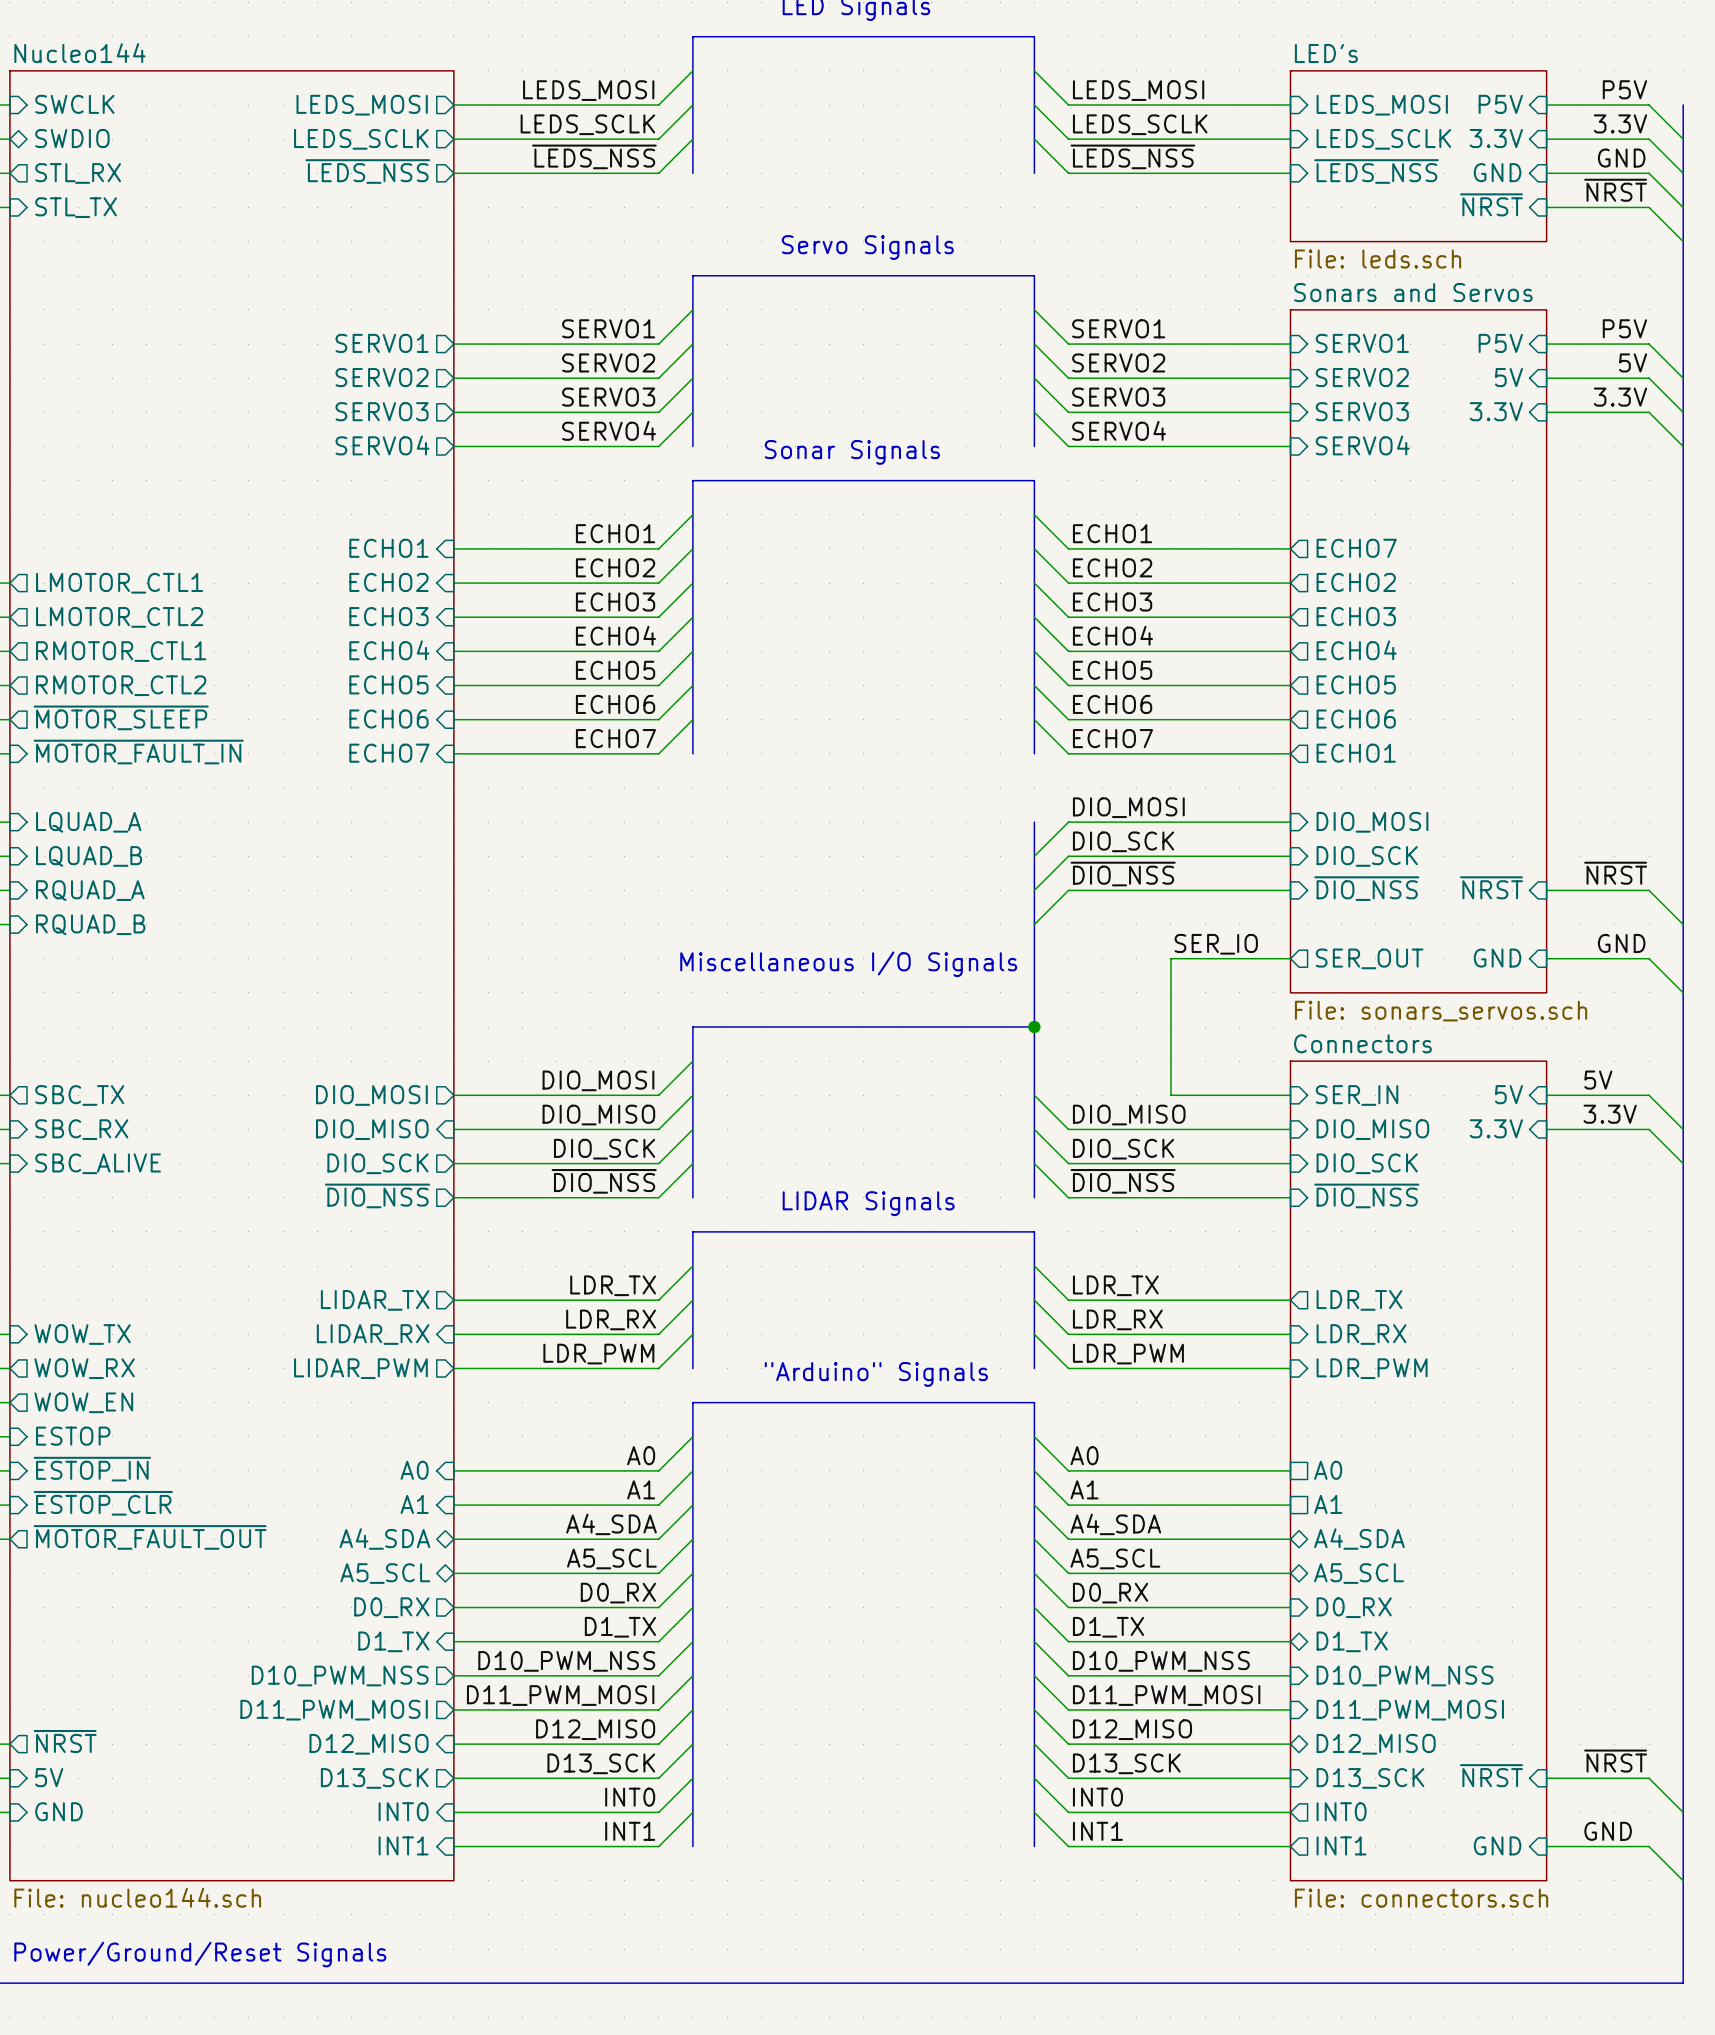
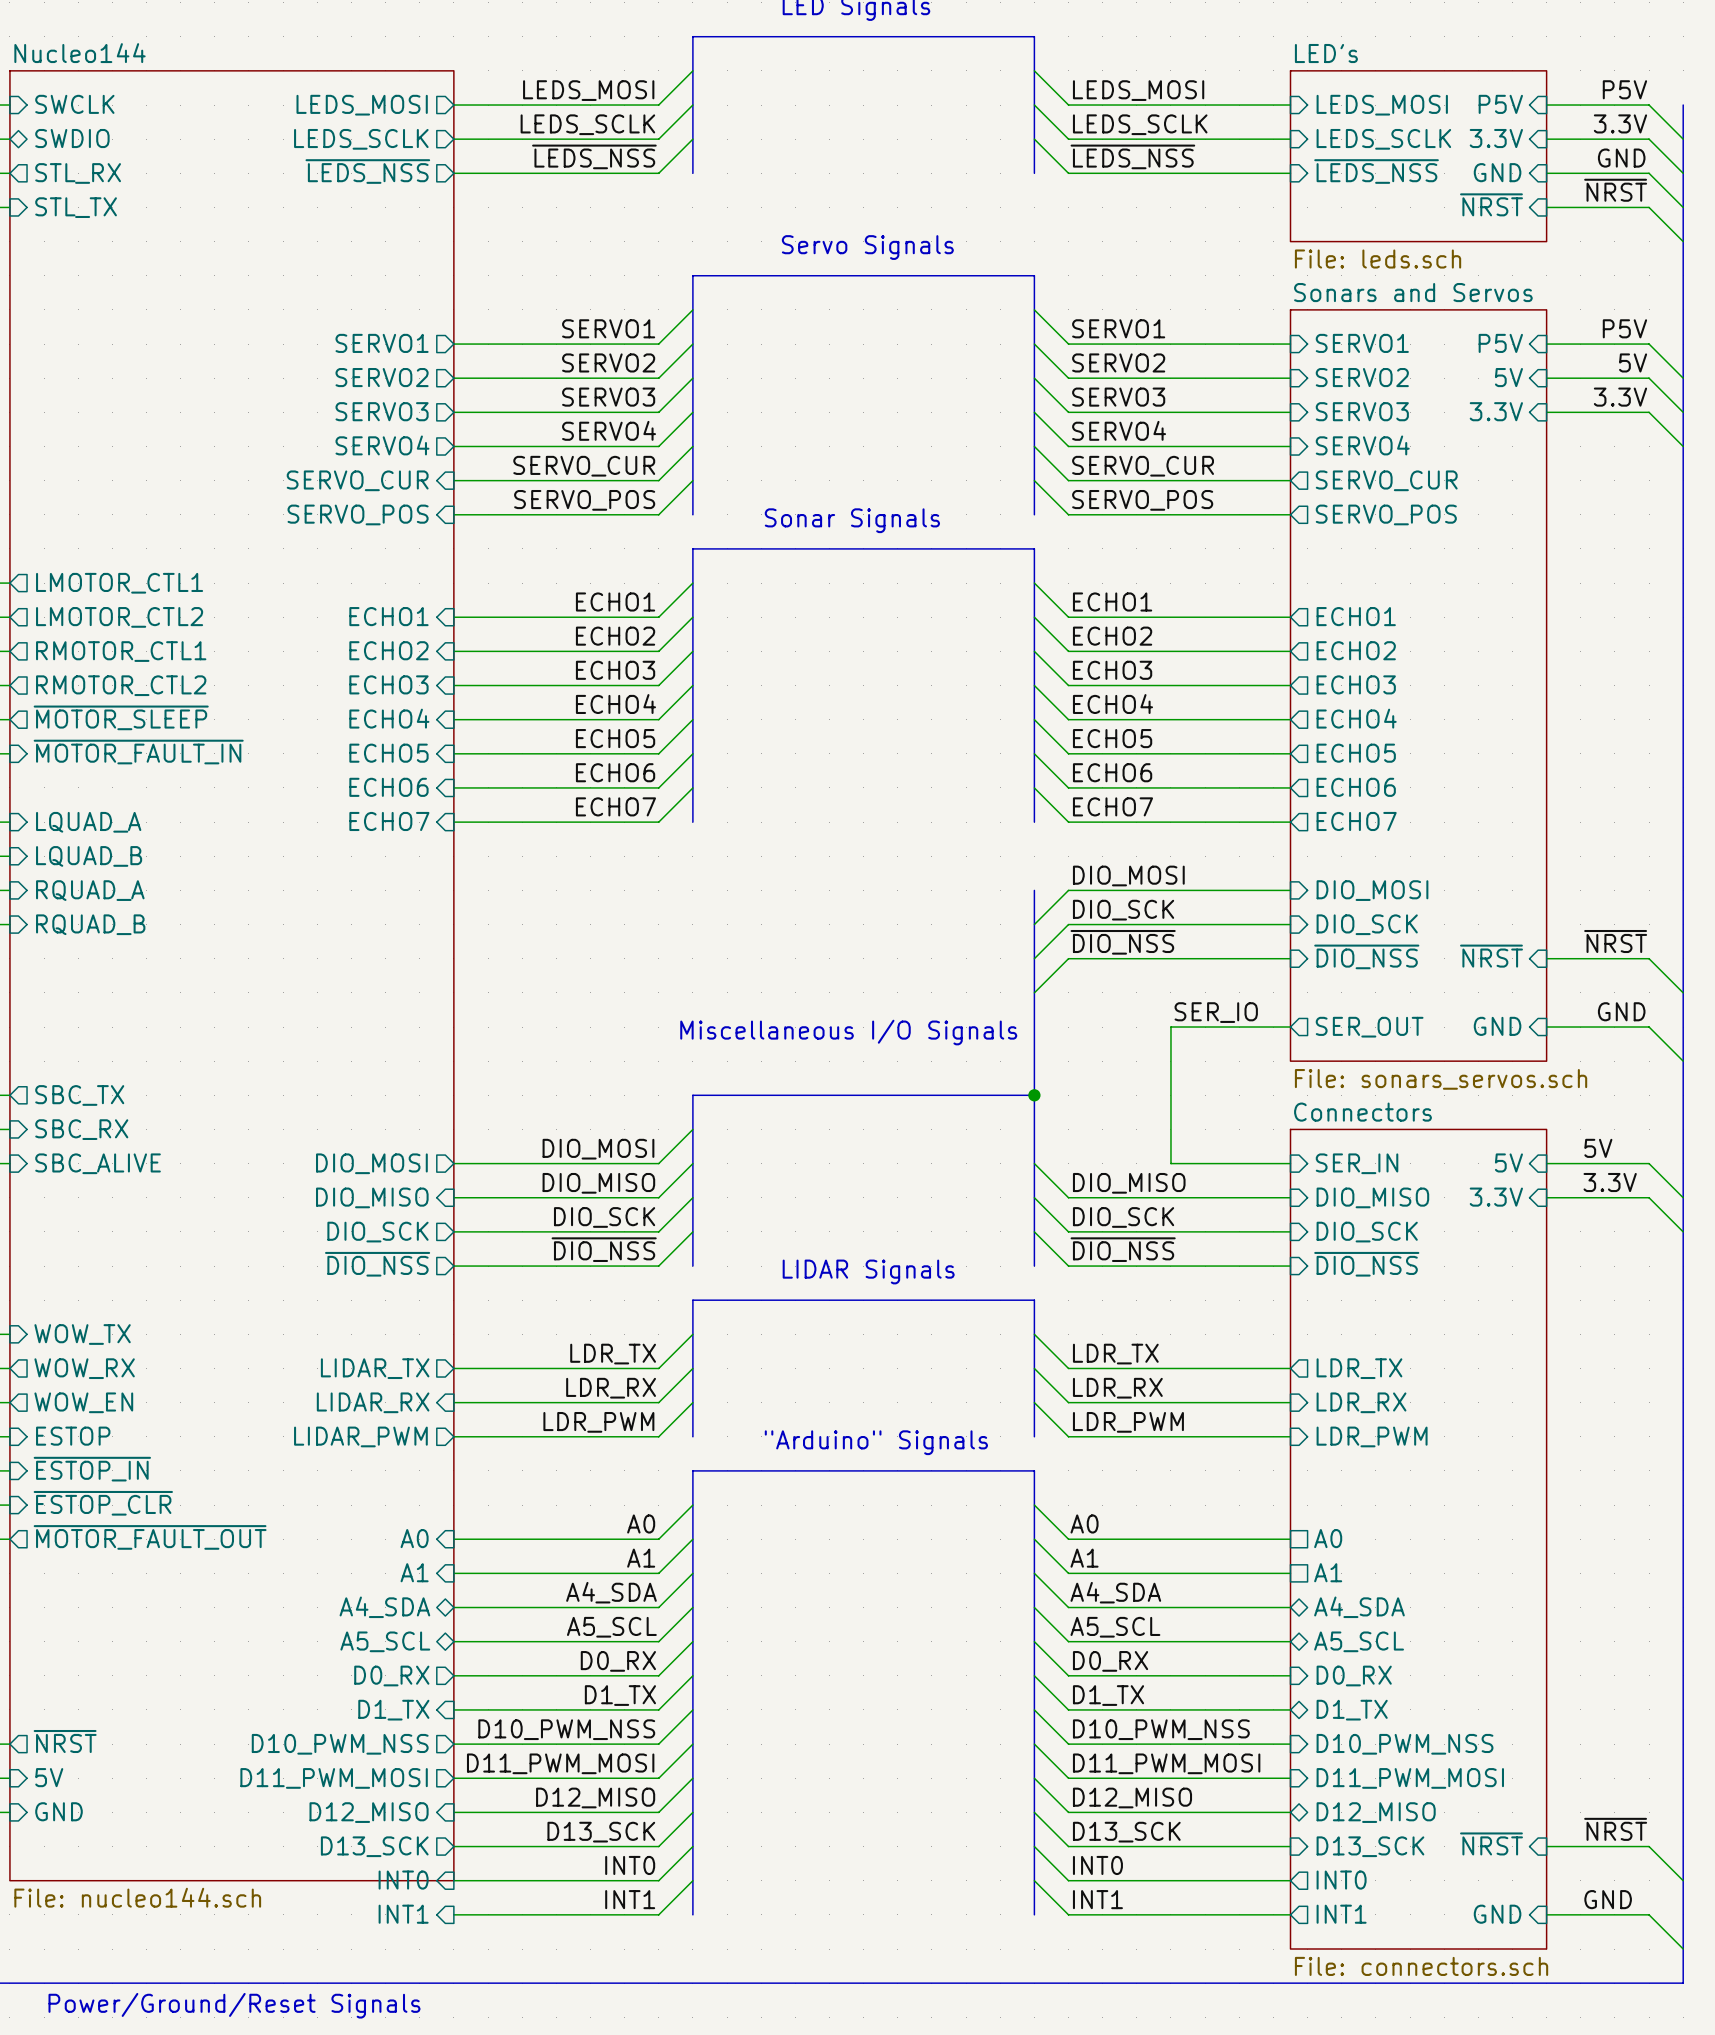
text position: Sonar Signals (852, 452) -> Sonar Signals (852, 520)
label: none -> SERVO_CUR (584, 466)
label: none -> SERVO_CUR (1143, 466)
sheet pin: none -> SERVO_CUR (357, 480)
bus: (692, 480) (1034, 480) -> (692, 480) (692, 446)
sheet pin: none -> SERVO_CUR (1386, 480)
label: none -> SERVO_POS (584, 500)
label: none -> SERVO_POS (1142, 500)
sheet pin: none -> SERVO_POS (358, 514)
wire: (692, 514) (658, 548) (453, 548) -> (692, 446) (658, 480) (453, 480)
bus: (692, 514) (692, 548) -> (1034, 548) (692, 548)
wire: (1034, 514) (1068, 548) (1290, 548) -> (1034, 446) (1068, 480) (1290, 480)
bus: (1034, 514) (1034, 548) -> (1034, 446) (1034, 480)
sheet pin: none -> SERVO_POS (1386, 514)
label: ECHO1 (615, 533) -> none
label: ECHO1 (1112, 533) -> none
sheet pin: ECHO1 (388, 548) -> none
wire: (692, 548) (658, 583) (453, 583) -> (692, 480) (658, 514) (453, 514)
wire: (1034, 548) (1068, 583) (1290, 583) -> (1034, 480) (1068, 514) (1290, 514)
sheet pin: ECHO7 (1356, 548) -> none
label: ECHO2 (615, 567) -> none
label: ECHO2 (1112, 567) -> none
sheet pin: ECHO2 (388, 582) -> none
sheet pin: ECHO2 (1356, 582) -> none
label: ECHO3 (615, 601) -> ECHO1 (615, 601)
label: ECHO3 (1112, 601) -> ECHO1 (1112, 601)
sheet pin: ECHO3 (388, 616) -> ECHO1 (388, 616)
sheet pin: ECHO3 (1356, 616) -> ECHO1 (1356, 616)
label: ECHO4 (615, 635) -> ECHO2 (615, 636)
label: ECHO4 (1112, 635) -> ECHO2 (1112, 636)
sheet pin: ECHO4 (389, 650) -> ECHO2 (388, 650)
sheet pin: ECHO4 (1356, 650) -> ECHO2 (1356, 650)
sheet Sonars and Servos: File: sonars_servos.sch (1418, 651) -> none
label: ECHO5 (615, 670) -> ECHO3 (615, 670)
label: ECHO5 (1112, 670) -> ECHO3 (1112, 670)
sheet pin: ECHO5 (388, 684) -> ECHO3 (388, 684)
sheet pin: ECHO5 (1356, 684) -> ECHO3 (1356, 684)
sheet Sonars and Servos: none -> File: sonars_servos.sch (1418, 685)
label: ECHO6 (615, 704) -> ECHO4 (615, 704)
label: ECHO6 (1112, 704) -> ECHO4 (1112, 704)
sheet pin: ECHO6 (388, 719) -> ECHO4 (389, 718)
sheet pin: ECHO6 (1356, 719) -> ECHO4 (1356, 718)
label: ECHO7 (615, 738) -> ECHO5 (615, 738)
label: ECHO7 (1112, 738) -> ECHO5 (1112, 738)
sheet pin: ECHO7 (389, 753) -> ECHO5 (388, 753)
wire: none -> (692, 753) (658, 787) (453, 787)
bus: none -> (692, 753) (692, 822)
wire: none -> (1034, 753) (1068, 787) (1290, 787)
sheet pin: ECHO1 (1356, 753) -> ECHO5 (1356, 753)
label: none -> ECHO6 (615, 772)
label: none -> ECHO6 (1112, 772)
sheet pin: none -> ECHO6 (388, 787)
sheet pin: none -> ECHO6 (1356, 787)
label: none -> ECHO7 (615, 806)
label: DIO_MOSI (1128, 807) -> ECHO7 (1112, 806)
sheet pin: none -> ECHO7 (389, 821)
bus: (1034, 822) (1034, 890) -> (1034, 822) (1034, 753)
wire: (1068, 822) (1034, 856) -> (1068, 822) (1034, 787)
sheet pin shape: input (1372, 822) -> output (1356, 821)
sheet pin: DIO_MOSI (1372, 822) -> ECHO7 (1356, 821)
label position: DIO_SCK (1123, 841) -> DIO_SCK (1123, 910)
wire: (1290, 856) (1068, 856) (1034, 890) -> (1290, 924) (1068, 924) (1034, 958)
sheet pin position: DIO_SCK (1367, 856) -> DIO_SCK (1367, 924)
label: ~{NRST} (1615, 873) -> none
label: ~{DIO_NSS} (1123, 874) -> DIO_MOSI (1128, 875)
sheet pin: ~{NRST} (1491, 887) -> none
sheet pin: ~{DIO_NSS} (1366, 888) -> DIO_MOSI (1372, 890)
wire: (1546, 890) (1649, 890) (1683, 924) -> (1546, 1163) (1649, 1163) (1683, 1197)
label: none -> ~{DIO_NSS} (1123, 942)
label: GND (1621, 943) -> ~{NRST} (1615, 941)
label position: SER_IO (1216, 944) -> SER_IO (1216, 1012)
wire: (1170, 958) (1170, 1027) -> (1290, 1027) (1170, 1027)
wire: none -> (1170, 958) (1068, 958) (1034, 992)
sheet pin shape: output (1369, 958) -> input (1366, 956)
sheet pin: SER_OUT (1369, 958) -> ~{DIO_NSS} (1366, 956)
sheet pin: GND (1497, 958) -> ~{NRST} (1491, 956)
text position: Miscellaneous I/O Signals (848, 964) -> Miscellaneous I/O Signals (848, 1032)
label: none -> GND (1621, 1011)
sheet pin: none -> GND (1497, 1026)
bus: (1034, 1027) (692, 1027) (692, 1095) -> (1034, 1095) (692, 1095)
junction position: (1034, 1027) -> (1034, 1095)
sheet pin: none -> SER_OUT (1369, 1027)
wire: (692, 1061) (658, 1095) (453, 1095) -> (692, 787) (658, 822) (453, 822)
label: DIO_MOSI (598, 1080) -> none
label position: 5V (1598, 1080) -> 5V (1598, 1148)
sheet pin position: 5V (1508, 1094) -> 5V (1508, 1162)
sheet pin: DIO_MOSI (371, 1095) -> none
wire: (692, 1095) (658, 1129) (453, 1129) -> none
wire: (1034, 1095) (1068, 1129) (1290, 1129) -> none
wire: (1170, 1095) (1290, 1095) -> (1170, 1095) (1170, 1163)
sheet pin: SER_IN (1357, 1095) -> none
wire: (1546, 1095) (1649, 1095) (1683, 1129) -> (1546, 1027) (1649, 1027) (1683, 1061)
label position: 3.3V (1610, 1114) -> 3.3V (1610, 1182)
label: DIO_MISO (598, 1115) -> none
label: DIO_MISO (1129, 1115) -> none
sheet pin position: 3.3V (1496, 1128) -> 3.3V (1496, 1197)
sheet pin: DIO_MISO (372, 1129) -> none
wire: (1034, 1129) (1068, 1163) (1170, 1163) -> none
sheet pin: DIO_MISO (1372, 1129) -> none
wire: (1546, 1129) (1649, 1129) (1683, 1163) -> (1546, 1197) (1649, 1197) (1683, 1231)
label: DIO_SCK (604, 1149) -> DIO_MOSI (598, 1149)
label position: DIO_SCK (1123, 1149) -> DIO_SCK (1123, 1217)
sheet pin: DIO_SCK (377, 1163) -> DIO_MOSI (371, 1163)
sheet pin: DIO_SCK (1367, 1163) -> SER_IN (1357, 1163)
label: ~{DIO_NSS} (604, 1181) -> DIO_MISO (598, 1183)
label: ~{DIO_NSS} (1123, 1181) -> DIO_MISO (1129, 1183)
sheet pin shape: output (377, 1195) -> input (372, 1197)
sheet pin: ~{DIO_NSS} (377, 1195) -> DIO_MISO (372, 1197)
sheet pin: ~{DIO_NSS} (1366, 1195) -> DIO_MISO (1372, 1197)
text position: LIDAR Signals (868, 1203) -> LIDAR Signals (868, 1271)
label: none -> DIO_SCK (604, 1217)
bus: (692, 1231) (1034, 1231) -> (692, 1231) (692, 1197)
sheet pin: none -> DIO_SCK (377, 1232)
sheet pin: none -> DIO_SCK (1367, 1232)
label: none -> ~{DIO_NSS} (604, 1249)
label: none -> ~{DIO_NSS} (1123, 1249)
sheet pin: none -> ~{DIO_NSS} (377, 1264)
sheet pin: none -> ~{DIO_NSS} (1366, 1264)
wire: (692, 1266) (658, 1300) (453, 1300) -> (692, 1197) (658, 1231) (453, 1231)
bus: (692, 1266) (692, 1300) -> (1034, 1300) (692, 1300)
wire: (1034, 1266) (1068, 1300) (1290, 1300) -> (1034, 1197) (1068, 1231) (1290, 1231)
bus: (1034, 1266) (1034, 1300) -> (1034, 1197) (1034, 1231)
label: LDR_TX (613, 1285) -> none
label: LDR_TX (1115, 1285) -> none
sheet pin: LIDAR_TX (375, 1300) -> none
wire: (692, 1300) (658, 1334) (453, 1334) -> (692, 1231) (658, 1266) (453, 1266)
wire: (1034, 1300) (1068, 1334) (1290, 1334) -> (1034, 1231) (1068, 1266) (1290, 1266)
sheet pin: LDR_TX (1359, 1300) -> none
label position: LDR_RX (611, 1319) -> LDR_RX (611, 1388)
label position: LDR_RX (1117, 1319) -> LDR_RX (1117, 1388)
sheet pin position: LIDAR_RX (373, 1334) -> LIDAR_RX (373, 1402)
sheet pin position: LDR_RX (1361, 1334) -> LDR_RX (1361, 1402)
label: LDR_PWM (598, 1354) -> LDR_TX (613, 1354)
label: LDR_PWM (1128, 1354) -> LDR_TX (1115, 1354)
sheet pin: LIDAR_PWM (360, 1368) -> LIDAR_TX (375, 1368)
sheet pin shape: input (1372, 1368) -> output (1359, 1368)
sheet pin: LDR_PWM (1372, 1368) -> LDR_TX (1359, 1368)
text position: "Arduino" Signals (876, 1374) -> "Arduino" Signals (876, 1442)
bus: (692, 1402) (1034, 1402) -> (692, 1402) (692, 1368)
label: none -> LDR_PWM (598, 1422)
label: none -> LDR_PWM (1128, 1422)
sheet pin: none -> LIDAR_PWM (360, 1436)
wire: (692, 1436) (658, 1470) (453, 1470) -> (692, 1368) (658, 1402) (453, 1402)
bus: (692, 1436) (692, 1470) -> (1034, 1470) (692, 1470)
wire: (1034, 1436) (1068, 1470) (1290, 1470) -> (1034, 1368) (1068, 1402) (1290, 1402)
bus: (1034, 1436) (1034, 1470) -> (1034, 1368) (1034, 1402)
sheet pin: none -> LDR_PWM (1372, 1436)
label: A0 (641, 1455) -> none
label: A0 (1084, 1455) -> none
sheet pin: A0 (414, 1470) -> none
wire: (692, 1470) (658, 1505) (453, 1505) -> (692, 1402) (658, 1436) (453, 1436)
wire: (1034, 1470) (1068, 1505) (1290, 1505) -> (1034, 1402) (1068, 1436) (1290, 1436)
sheet pin: A0 (1328, 1470) -> none
sheet Connectors position: (1418, 1470) -> (1418, 1539)
label: A1 (641, 1489) -> none
label: A1 (1084, 1489) -> none
sheet pin: A1 (414, 1504) -> none
sheet pin: A1 (1328, 1504) -> none
label: A4_SDA (611, 1524) -> A0 (641, 1523)
label: A4_SDA (1115, 1524) -> A0 (1084, 1523)
sheet pin shape: bidirectional (384, 1538) -> input (414, 1538)
sheet pin: A4_SDA (384, 1538) -> A0 (414, 1538)
sheet pin shape: bidirectional (1359, 1538) -> passive (1328, 1538)
sheet pin: A4_SDA (1359, 1538) -> A0 (1328, 1538)
label: A5_SCL (611, 1558) -> A1 (641, 1558)
label: A5_SCL (1115, 1558) -> A1 (1084, 1558)
sheet pin shape: bidirectional (385, 1573) -> input (414, 1572)
sheet pin: A5_SCL (385, 1573) -> A1 (414, 1572)
sheet pin shape: bidirectional (1359, 1573) -> passive (1328, 1572)
sheet pin: A5_SCL (1359, 1573) -> A1 (1328, 1572)
label: D0_RX (618, 1593) -> A4_SDA (611, 1592)
label: D0_RX (1110, 1593) -> A4_SDA (1115, 1592)
sheet pin shape: output (391, 1607) -> bidirectional (384, 1607)
sheet pin: D0_RX (391, 1607) -> A4_SDA (384, 1607)
sheet pin shape: input (1354, 1607) -> bidirectional (1359, 1607)
sheet pin: D0_RX (1354, 1607) -> A4_SDA (1359, 1607)
label: D1_TX (620, 1627) -> A5_SCL (611, 1627)
label: D1_TX (1108, 1627) -> A5_SCL (1115, 1627)
sheet pin shape: input (393, 1641) -> bidirectional (385, 1641)
sheet pin: D1_TX (393, 1641) -> A5_SCL (385, 1641)
sheet pin: D1_TX (1352, 1641) -> A5_SCL (1359, 1641)
label: D10_PWM_NSS (566, 1661) -> D0_RX (618, 1661)
label: D10_PWM_NSS (1161, 1661) -> D0_RX (1110, 1661)
sheet pin: D10_PWM_NSS (340, 1675) -> D0_RX (391, 1675)
sheet pin: D10_PWM_NSS (1405, 1675) -> D0_RX (1354, 1675)
label: D11_PWM_MOSI (560, 1695) -> D1_TX (620, 1695)
label: D11_PWM_MOSI (1166, 1695) -> D1_TX (1108, 1695)
sheet pin shape: output (334, 1710) -> input (393, 1710)
sheet pin: D11_PWM_MOSI (334, 1710) -> D1_TX (393, 1710)
sheet pin shape: input (1410, 1710) -> bidirectional (1352, 1710)
sheet pin: D11_PWM_MOSI (1410, 1710) -> D1_TX (1352, 1710)
label: D12_MISO (595, 1729) -> D10_PWM_NSS (566, 1729)
label: D12_MISO (1132, 1729) -> D10_PWM_NSS (1161, 1729)
sheet pin shape: input (369, 1744) -> output (340, 1744)
sheet pin: D12_MISO (369, 1744) -> D10_PWM_NSS (340, 1744)
sheet pin shape: bidirectional (1376, 1744) -> input (1405, 1744)
sheet pin: D12_MISO (1376, 1744) -> D10_PWM_NSS (1405, 1744)
label position: ~{NRST} (1615, 1761) -> ~{NRST} (1615, 1829)
label: D13_SCK (601, 1763) -> D11_PWM_MOSI (560, 1763)
label: D13_SCK (1126, 1763) -> D11_PWM_MOSI (1166, 1763)
sheet pin: ~{NRST} (1491, 1775) -> none
sheet pin: D13_SCK (374, 1778) -> D11_PWM_MOSI (334, 1778)
sheet pin: D13_SCK (1370, 1778) -> D11_PWM_MOSI (1410, 1778)
wire: (1546, 1778) (1649, 1778) (1683, 1812) -> (1546, 1914) (1649, 1914) (1683, 1949)
label: INT0 (630, 1797) -> D12_MISO (595, 1797)
label: INT0 (1097, 1797) -> D12_MISO (1132, 1797)
sheet pin: INT0 (403, 1811) -> D12_MISO (369, 1812)
sheet pin shape: output (1341, 1811) -> bidirectional (1376, 1812)
sheet pin: INT0 (1341, 1811) -> D12_MISO (1376, 1812)
label: INT1 (630, 1831) -> D13_SCK (601, 1832)
label: INT1 (1097, 1831) -> D13_SCK (1126, 1832)
label position: GND (1608, 1831) -> GND (1608, 1899)
sheet pin shape: input (403, 1845) -> output (374, 1846)
sheet pin: INT1 (403, 1845) -> D13_SCK (374, 1846)
sheet pin shape: output (1341, 1845) -> input (1370, 1846)
sheet pin: INT1 (1341, 1845) -> D13_SCK (1370, 1846)
sheet pin: GND (1497, 1845) -> ~{NRST} (1491, 1843)
wire: none -> (692, 1846) (658, 1880) (453, 1880)
bus: none -> (692, 1846) (692, 1914)
wire: none -> (1034, 1846) (1068, 1880) (1290, 1880)
bus: none -> (1034, 1846) (1034, 1914)
label: none -> INT0 (630, 1865)
label: none -> INT0 (1097, 1865)
sheet pin: none -> INT0 (403, 1880)
wire: none -> (692, 1880) (658, 1914) (453, 1914)
wire: none -> (1034, 1880) (1068, 1914) (1290, 1914)
sheet pin: none -> INT0 (1341, 1880)
label: none -> INT1 (630, 1899)
label: none -> INT1 (1097, 1899)
sheet pin: none -> INT1 (403, 1914)
sheet pin: none -> INT1 (1341, 1914)
sheet pin: none -> GND (1497, 1914)
text position: Power/Ground/Reset Signals (200, 1954) -> Power/Ground/Reset Signals (234, 2005)

